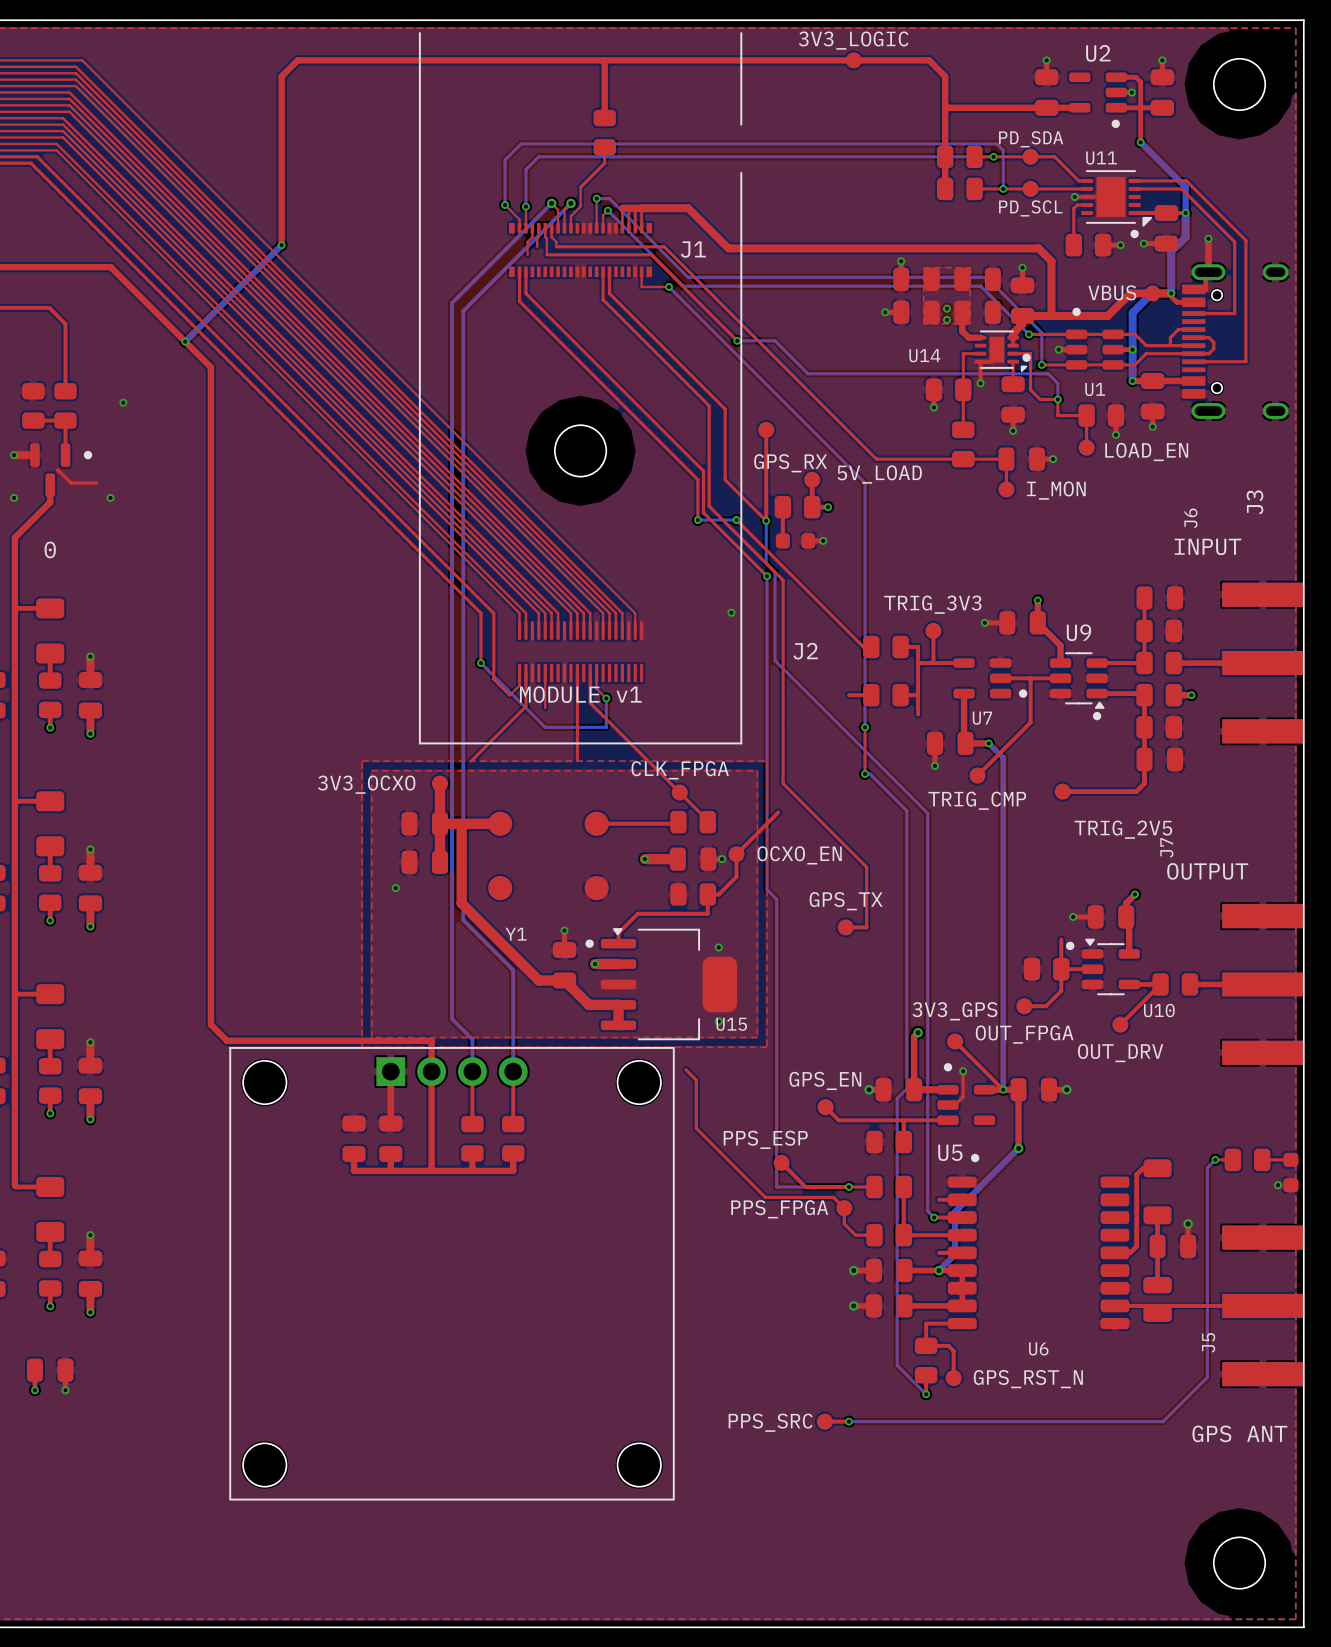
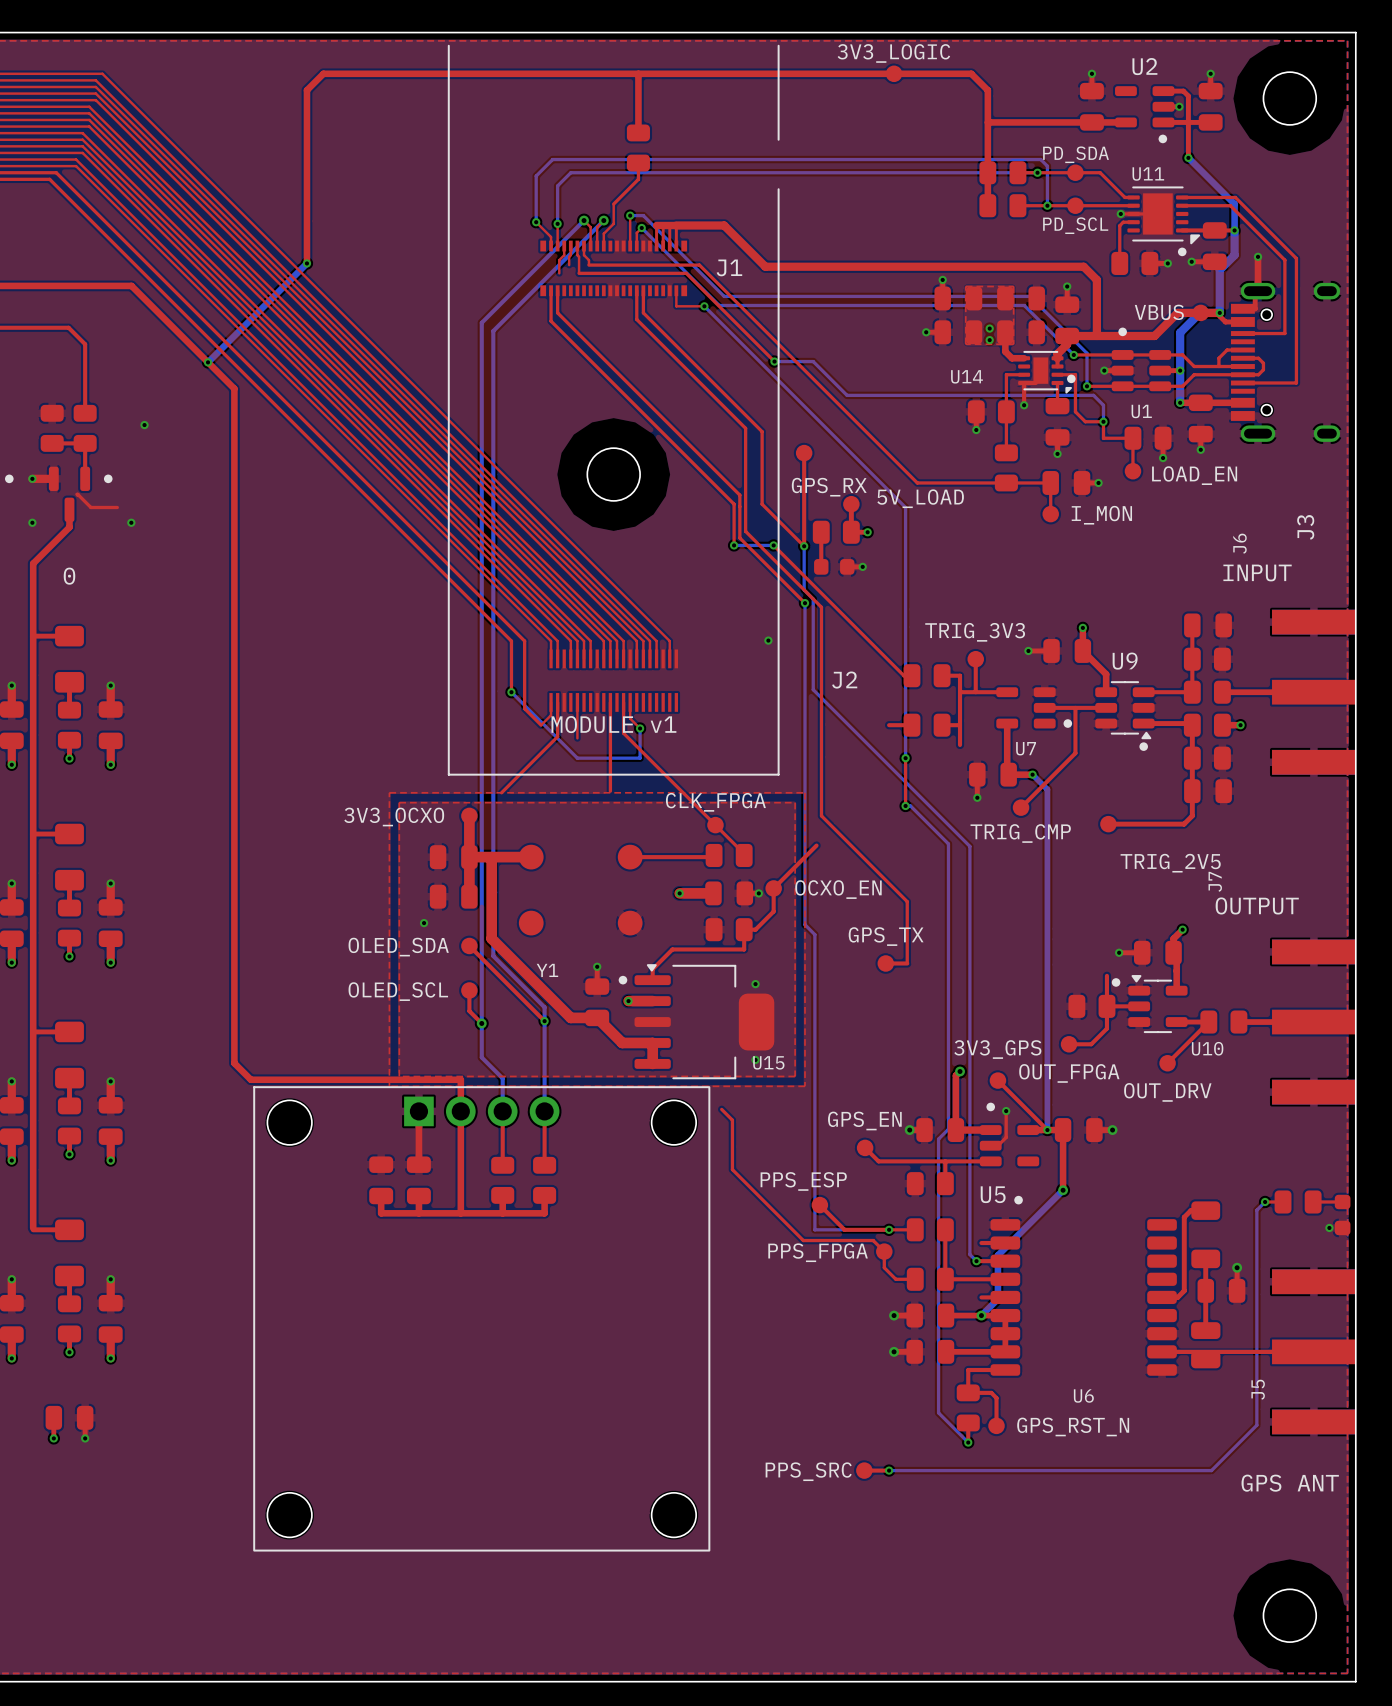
top track: none -> (469, 945) (544, 1021)
part: none -> OLED_SDA (469, 945)
top track: none -> (469, 990) (469, 1011) (481, 1023)
part: none -> OLED_SCL (469, 990)
via: none -> (544, 1021)
via: none -> (481, 1023)

